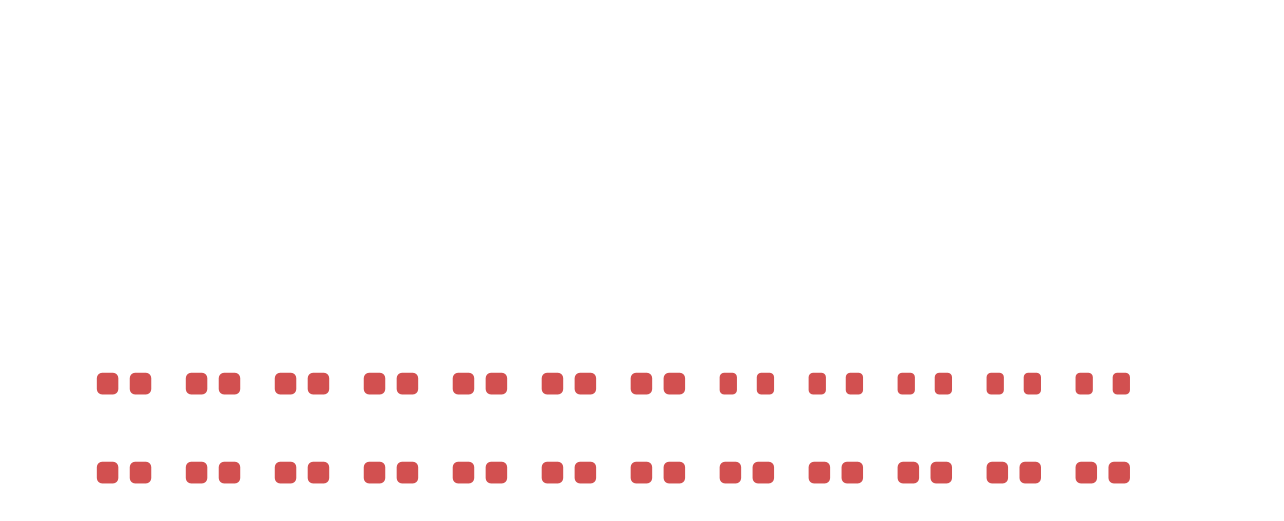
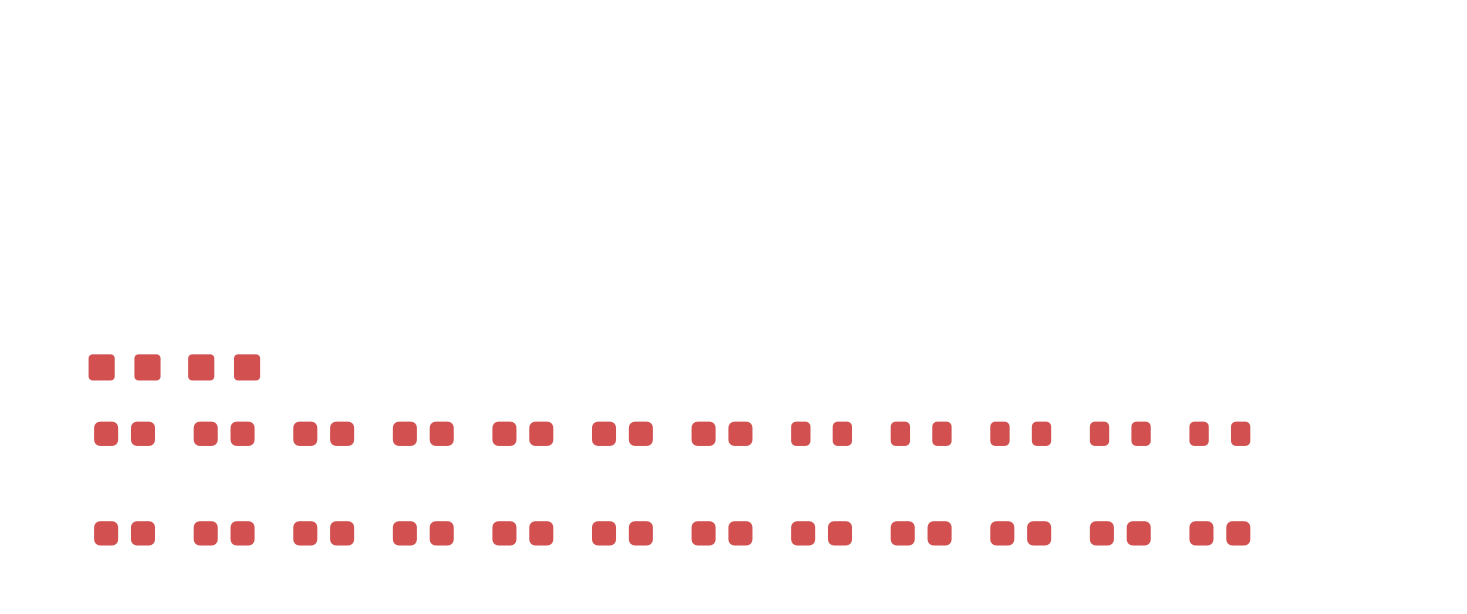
part: none -> (124, 367)
part: none -> (224, 367)

